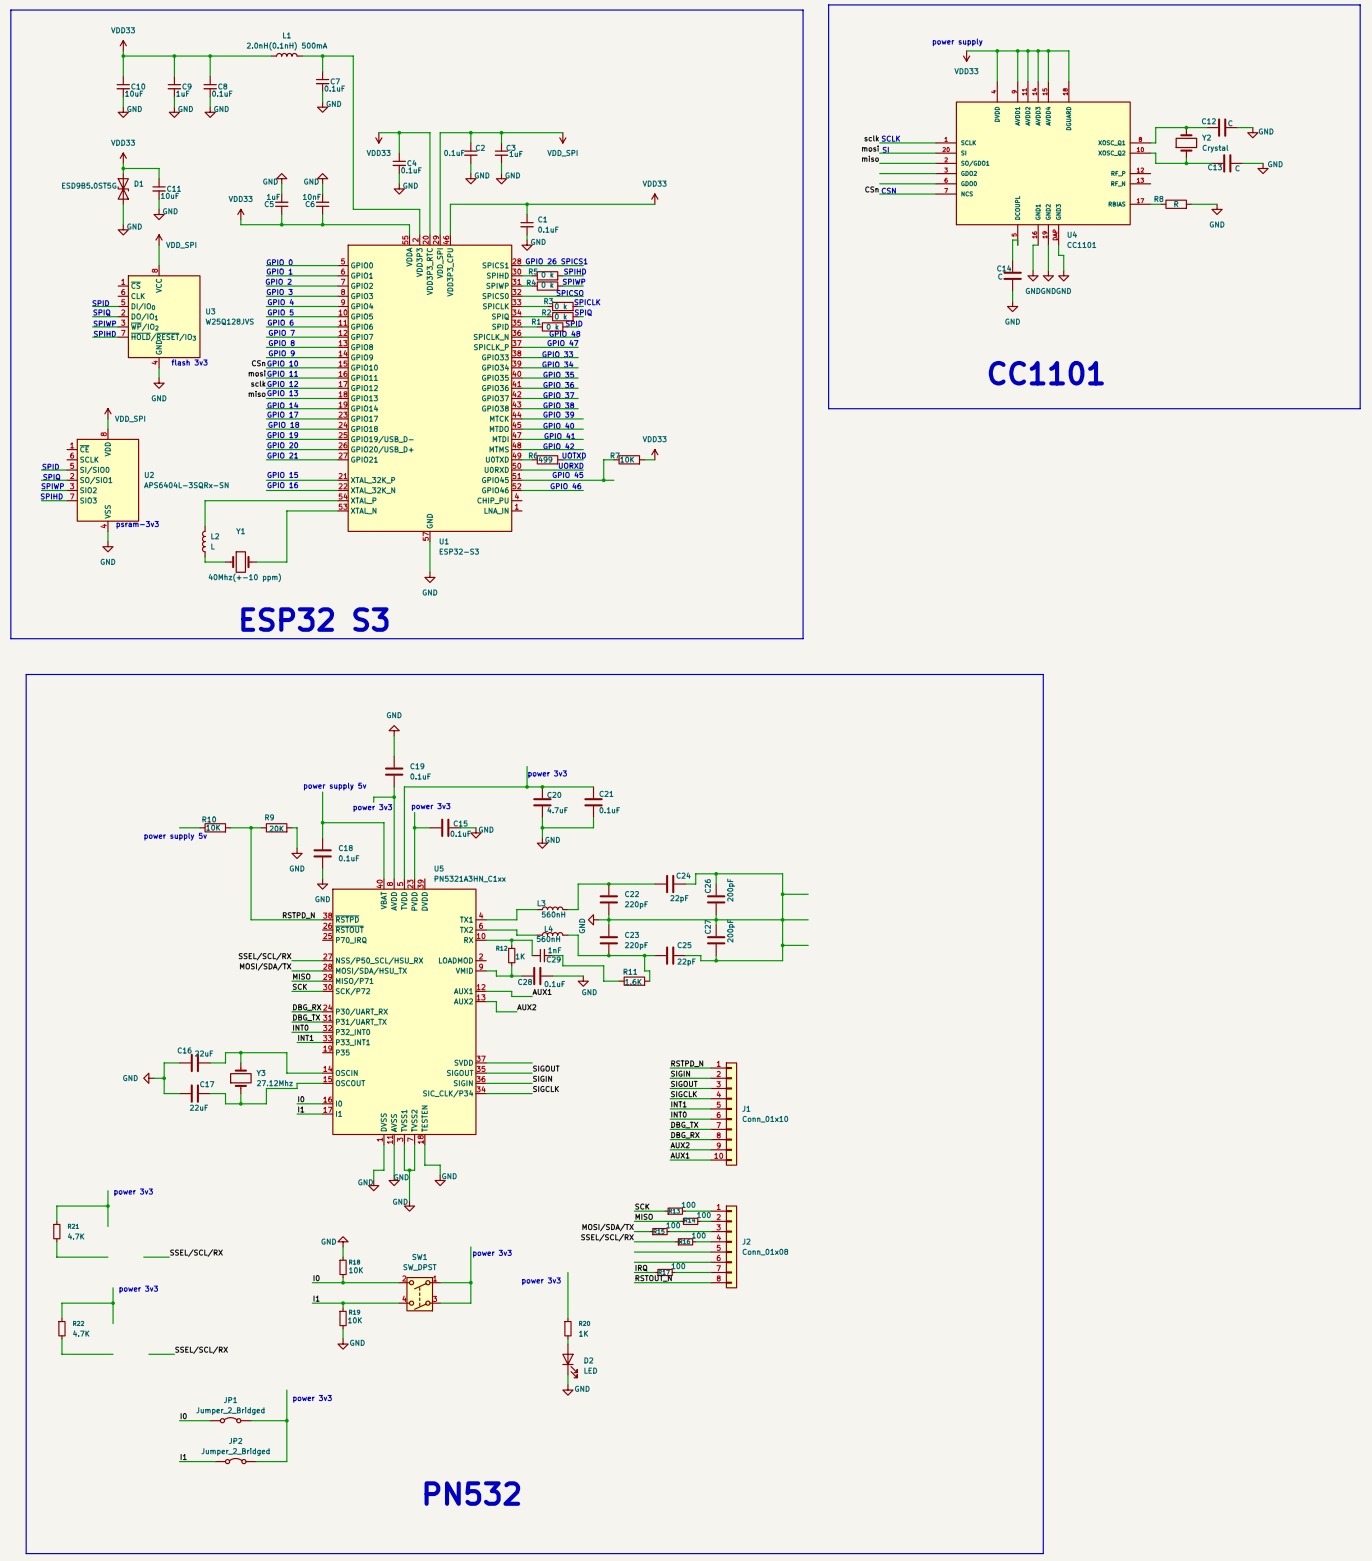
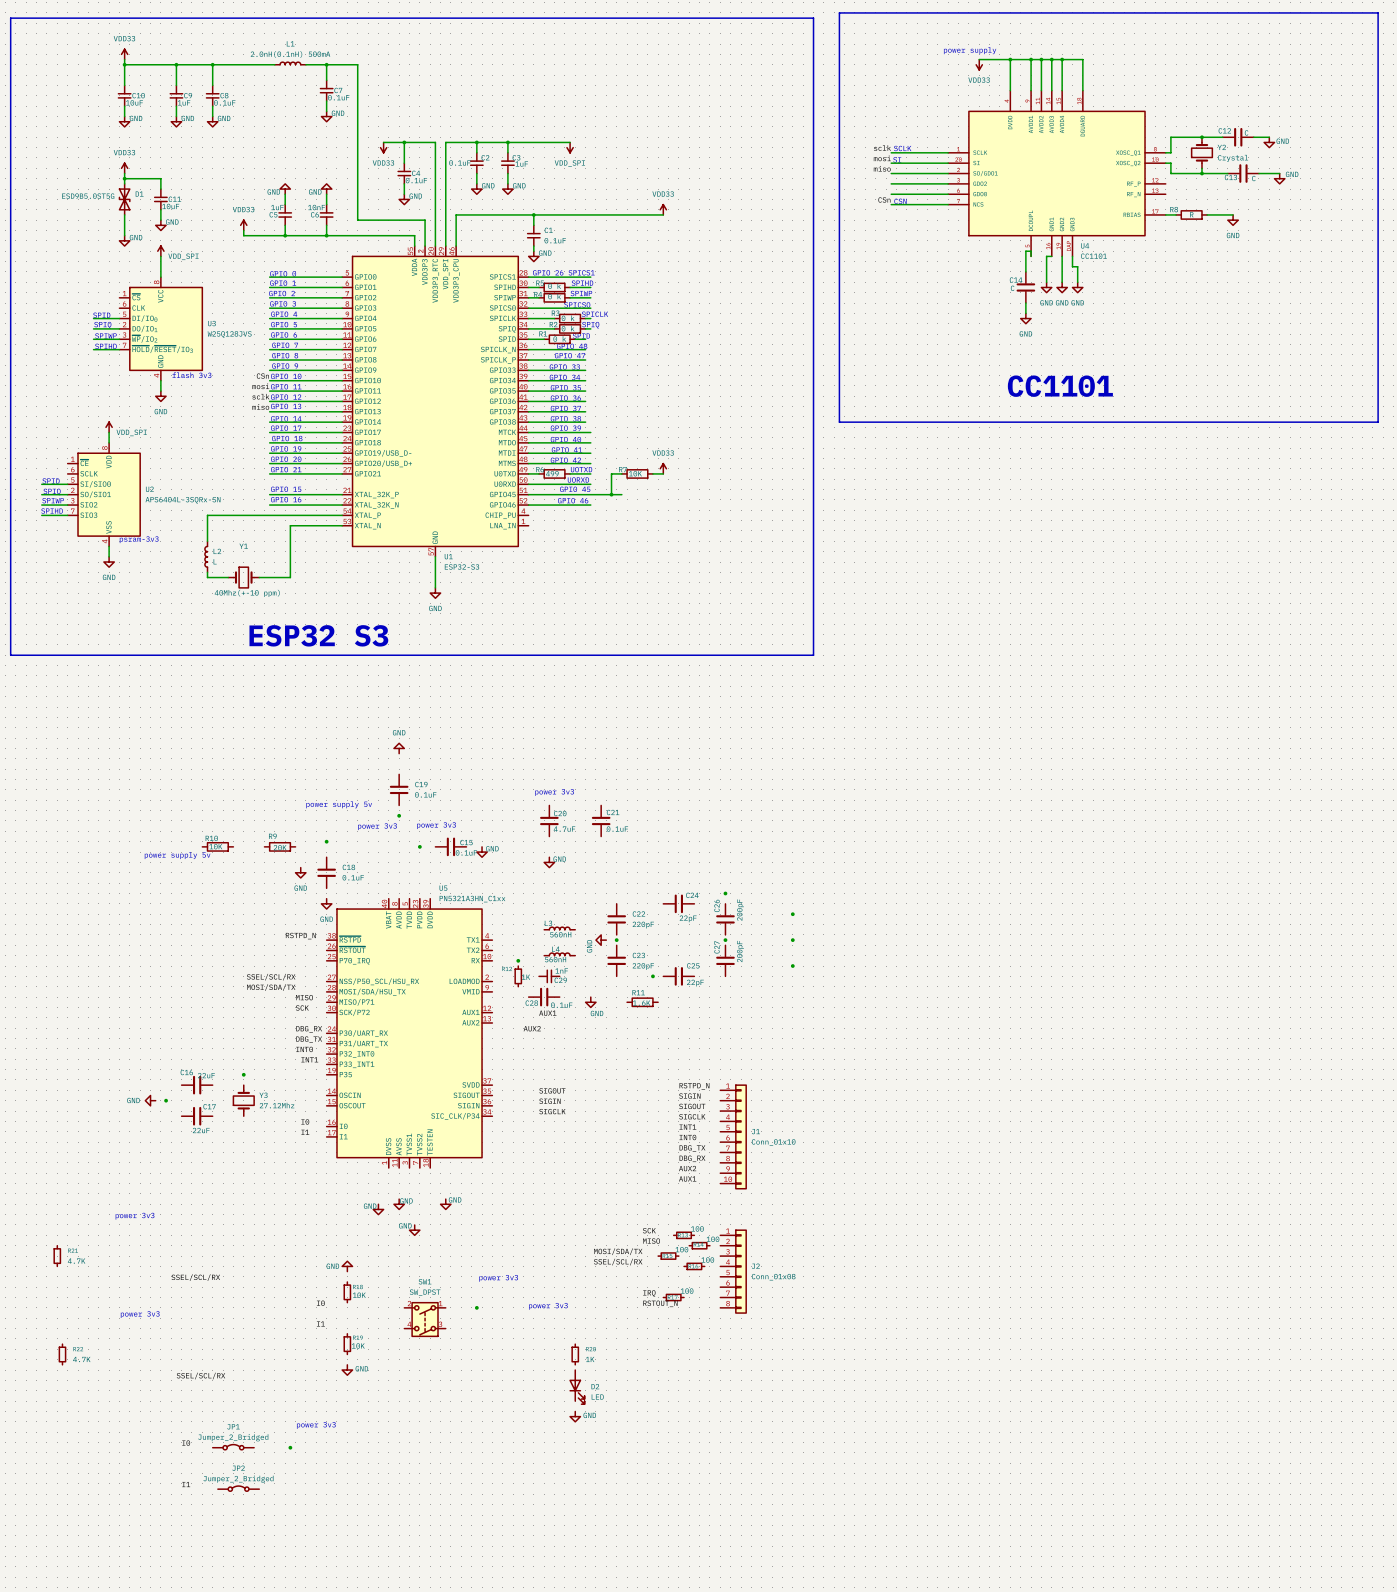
line: (26, 674) (1043, 674) (1043, 1553) (26, 1553) (26, 674) -> none
wire: (394, 735) (394, 756) -> none
wire: (527, 766) (527, 786) -> none
wire: (394, 786) (394, 878) -> none
junction: (527, 786) -> none
junction: (542, 786) -> none
wire: (593, 786) (404, 786) (404, 878) -> none
wire: (322, 792) (322, 838) -> none
wire: (394, 797) (373, 797) (373, 802) -> none
wire: (414, 812) (414, 878) -> none
wire: (542, 817) (542, 838) -> none
wire: (593, 817) (593, 827) (542, 827) -> none
wire: (322, 822) (383, 822) (383, 878) -> none
wire: (179, 827) (199, 827) -> none
wire: (230, 827) (261, 827) -> none
wire: (251, 827) (251, 919) (322, 919) -> none
junction: (251, 827) -> none
wire: (291, 827) (297, 827) (297, 848) -> none
wire: (414, 827) (429, 827) -> none
wire: (460, 827) (475, 827) -> none
junction: (542, 827) -> none
wire: (322, 868) (322, 878) -> none
wire: (716, 873) (716, 884) -> none
junction: (608, 884) -> none
wire: (654, 884) (578, 884) (578, 909) (567, 909) -> none
wire: (685, 884) (695, 884) (695, 873) (782, 873) (782, 960) (700, 960) (700, 955) (685, 955) -> none
wire: (782, 894) (808, 894) -> none
wire: (537, 909) (516, 909) (516, 919) (486, 919) -> none
wire: (608, 914) (608, 924) -> none
wire: (716, 914) (716, 924) -> none
wire: (598, 919) (808, 919) -> none
wire: (486, 930) (516, 930) (516, 935) (537, 935) -> none
wire: (567, 935) (578, 935) (578, 955) (654, 955) -> none
wire: (486, 940) (532, 940) (532, 955) -> none
wire: (511, 940) (511, 945) -> none
wire: (782, 945) (808, 945) -> none
wire: (552, 955) (562, 955) (562, 965) (603, 965) (603, 981) (619, 981) -> none
junction: (608, 955) -> none
wire: (644, 955) (644, 970) (649, 970) (649, 981) -> none
wire: (716, 955) (716, 960) -> none
wire: (291, 960) (322, 960) -> none
junction: (716, 960) -> none
wire: (511, 965) (511, 976) -> none
wire: (291, 970) (322, 970) -> none
wire: (486, 970) (496, 970) (496, 976) (521, 976) -> none
junction: (511, 976) -> none
wire: (552, 976) (583, 976) -> none
wire: (291, 981) (322, 981) -> none
wire: (291, 991) (322, 991) -> none
wire: (486, 991) (511, 991) (511, 996) (532, 996) -> none
wire: (486, 1001) (496, 1001) (496, 1011) (516, 1011) -> none
wire: (291, 1011) (322, 1011) -> none
wire: (291, 1022) (322, 1022) -> none
wire: (291, 1032) (322, 1032) -> none
wire: (297, 1042) (322, 1042) -> none
wire: (240, 1052) (240, 1062) -> none
wire: (179, 1062) (164, 1062) (164, 1093) (179, 1093) -> none
wire: (210, 1062) (225, 1062) (225, 1052) (286, 1052) (286, 1073) (322, 1073) -> none
wire: (486, 1062) (532, 1062) -> none
wire: (670, 1068) (711, 1068) -> none
wire: (486, 1073) (532, 1073) -> none
wire: (153, 1078) (164, 1078) -> none
wire: (670, 1078) (711, 1078) -> none
wire: (322, 1083) (297, 1083) (297, 1088) (266, 1088) (266, 1103) (225, 1103) (225, 1093) (210, 1093) -> none
wire: (486, 1083) (532, 1083) -> none
wire: (670, 1088) (711, 1088) -> none
wire: (240, 1093) (240, 1103) -> none
wire: (486, 1093) (532, 1093) -> none
wire: (670, 1098) (711, 1098) -> none
junction: (240, 1103) -> none
wire: (297, 1103) (322, 1103) -> none
wire: (670, 1108) (711, 1108) -> none
wire: (297, 1114) (322, 1114) -> none
wire: (670, 1119) (711, 1119) -> none
wire: (670, 1129) (711, 1129) -> none
wire: (670, 1139) (711, 1139) -> none
wire: (383, 1144) (383, 1170) (373, 1170) (373, 1180) -> none
wire: (394, 1144) (394, 1175) -> none
wire: (404, 1144) (404, 1170) (414, 1170) (414, 1144) -> none
wire: (424, 1144) (424, 1165) (440, 1165) (440, 1175) -> none
wire: (670, 1149) (711, 1149) -> none
wire: (670, 1160) (711, 1160) -> none
wire: (409, 1170) (409, 1200) -> none
junction: (409, 1170) -> none
wire: (107, 1190) (107, 1226) -> none
wire: (107, 1206) (56, 1206) (56, 1221) -> none
junction: (107, 1206) -> none
wire: (634, 1211) (665, 1211) -> none
wire: (685, 1211) (711, 1211) -> none
wire: (634, 1221) (680, 1221) -> none
wire: (700, 1221) (711, 1221) -> none
wire: (634, 1231) (649, 1231) -> none
wire: (670, 1231) (711, 1231) -> none
wire: (56, 1241) (56, 1257) (107, 1257) -> none
wire: (634, 1241) (675, 1241) -> none
wire: (695, 1241) (711, 1241) -> none
wire: (343, 1246) (343, 1257) -> none
wire: (470, 1246) (470, 1303) (440, 1303) -> none
wire: (634, 1252) (711, 1252) -> none
wire: (143, 1257) (169, 1257) -> none
wire: (634, 1262) (711, 1262) -> none
wire: (567, 1272) (567, 1318) -> none
wire: (634, 1272) (654, 1272) -> none
wire: (675, 1272) (711, 1272) -> none
wire: (343, 1277) (343, 1282) -> none
wire: (312, 1282) (399, 1282) -> none
junction: (343, 1282) -> none
wire: (440, 1282) (470, 1282) -> none
wire: (634, 1282) (711, 1282) -> none
wire: (113, 1287) (113, 1323) -> none
wire: (113, 1303) (61, 1303) (61, 1318) -> none
junction: (113, 1303) -> none
wire: (312, 1303) (399, 1303) -> none
wire: (343, 1303) (343, 1308) -> none
junction: (343, 1303) -> none
wire: (343, 1328) (343, 1338) -> none
wire: (61, 1338) (61, 1354) (113, 1354) -> none
wire: (567, 1338) (567, 1344) -> none
wire: (148, 1354) (174, 1354) -> none
wire: (567, 1374) (567, 1384) -> none
wire: (286, 1390) (286, 1461) (256, 1461) -> none
wire: (179, 1420) (210, 1420) -> none
wire: (251, 1420) (286, 1420) -> none
wire: (179, 1461) (215, 1461) -> none
text: PN532 (472, 1493) -> none

